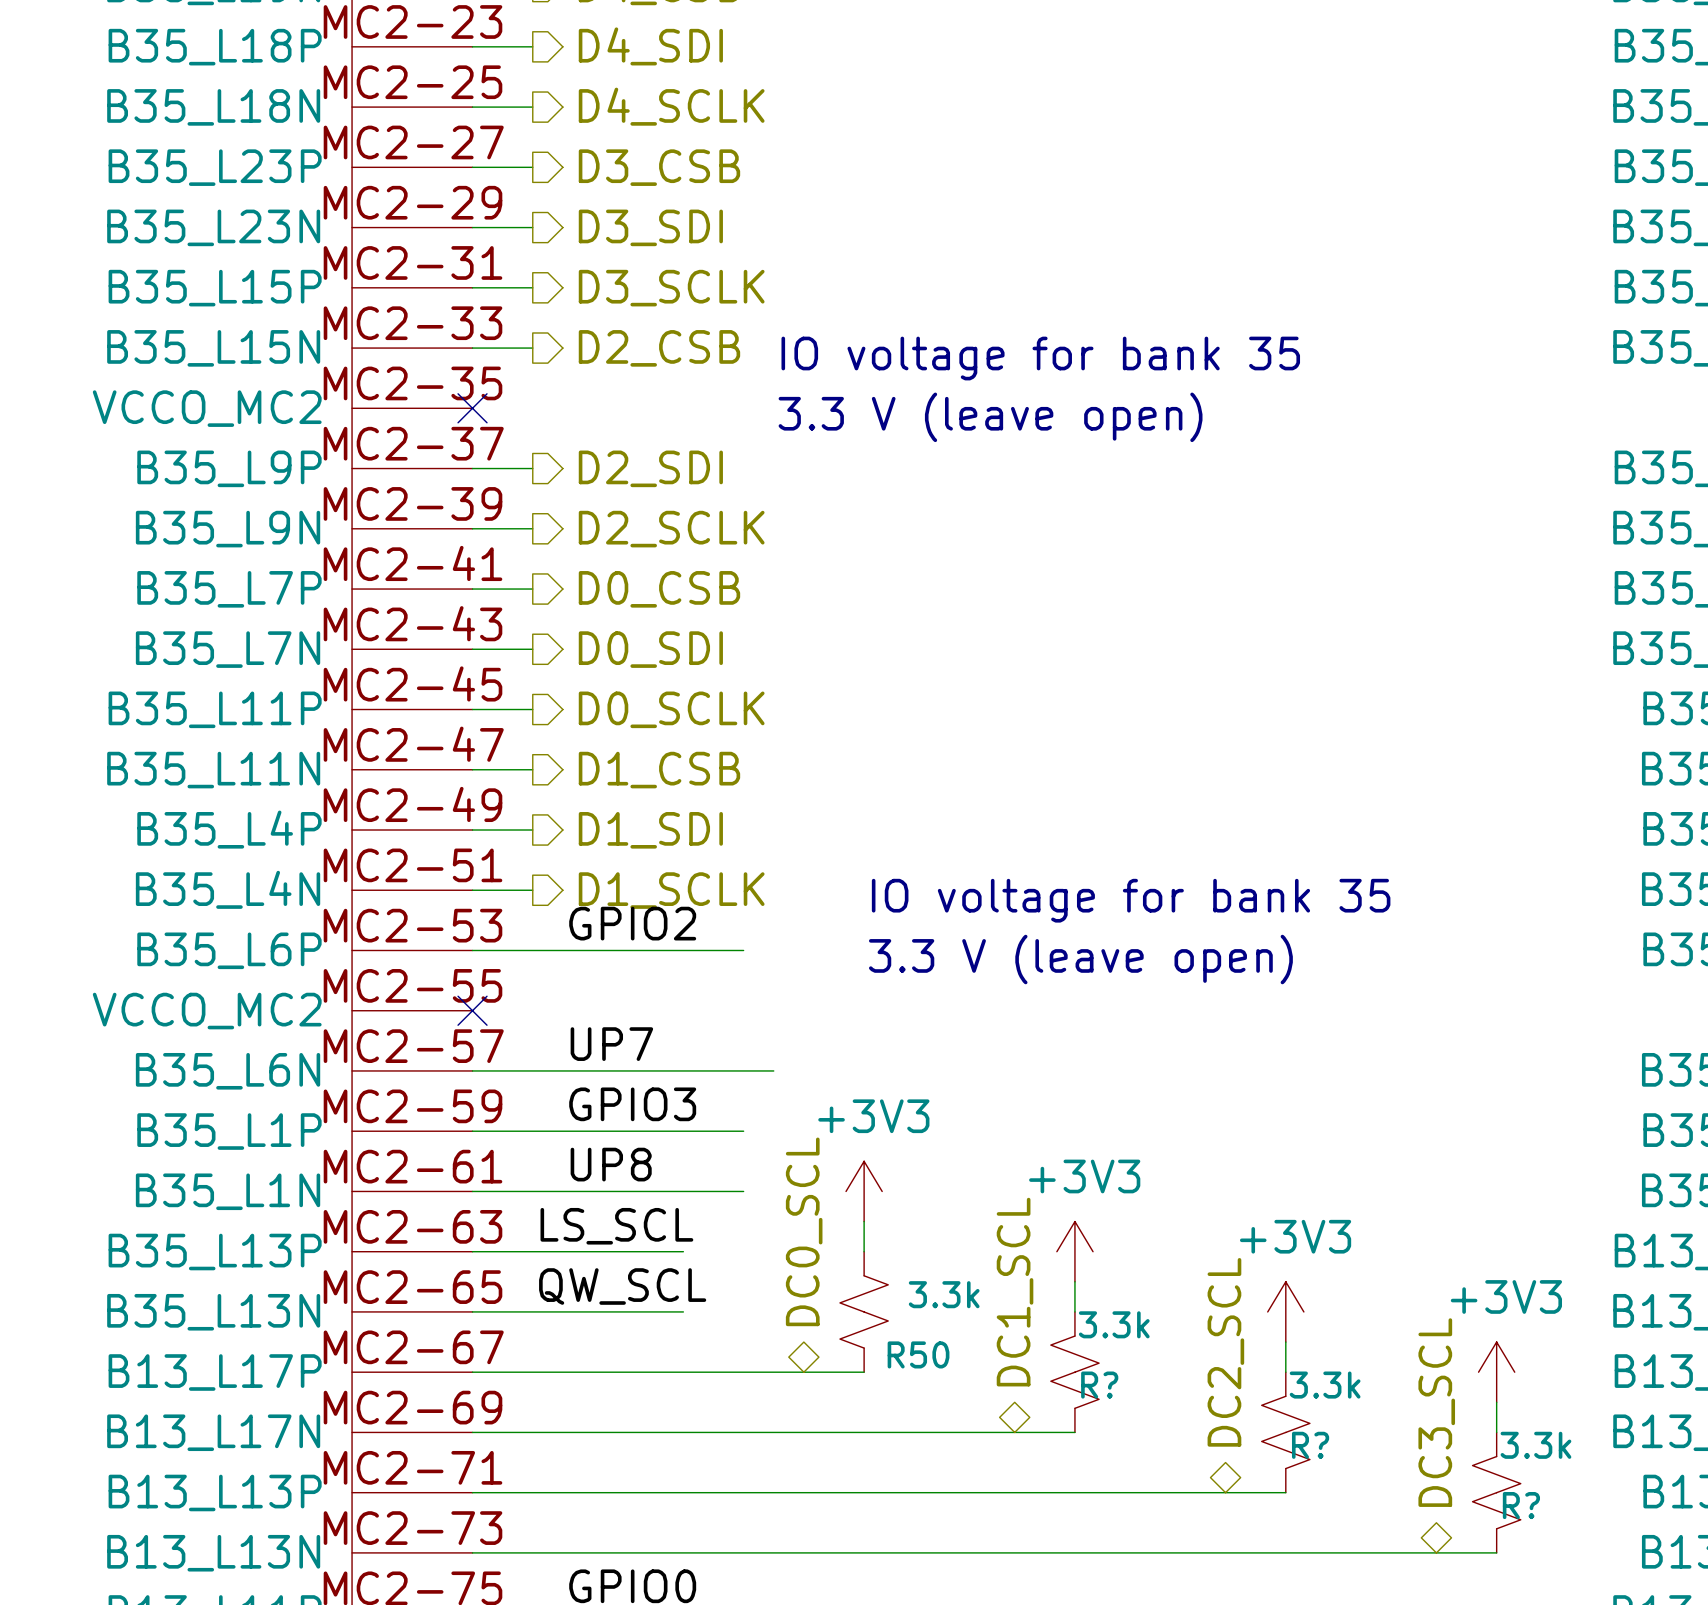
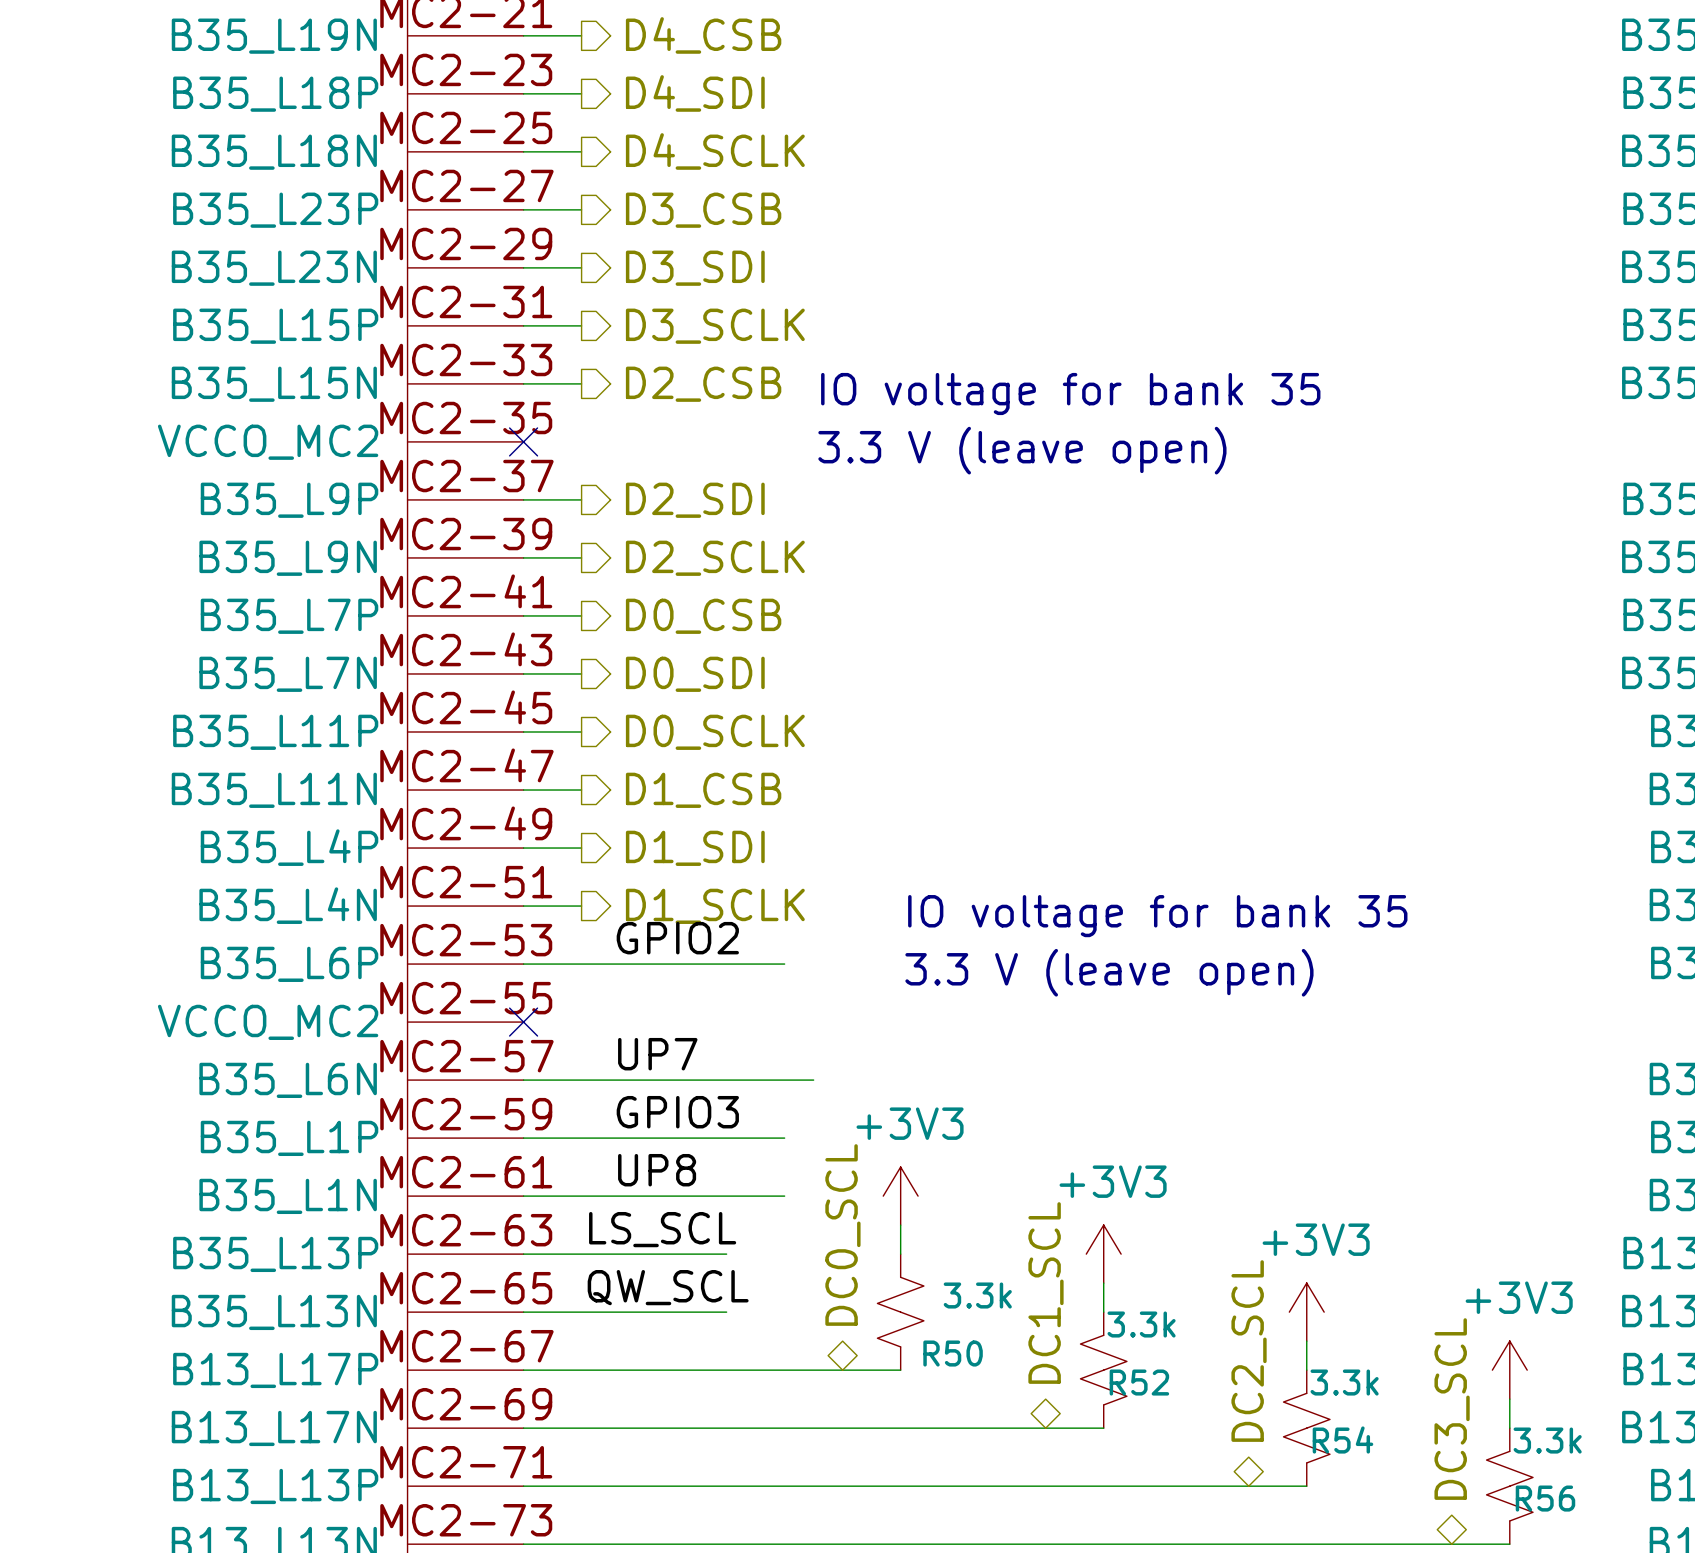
R? name: R? (1099, 1385) -> R52 (1139, 1382)
R? name: R? (1310, 1445) -> R54 (1342, 1440)
R? name: R? (1521, 1505) -> R56 (1545, 1498)

